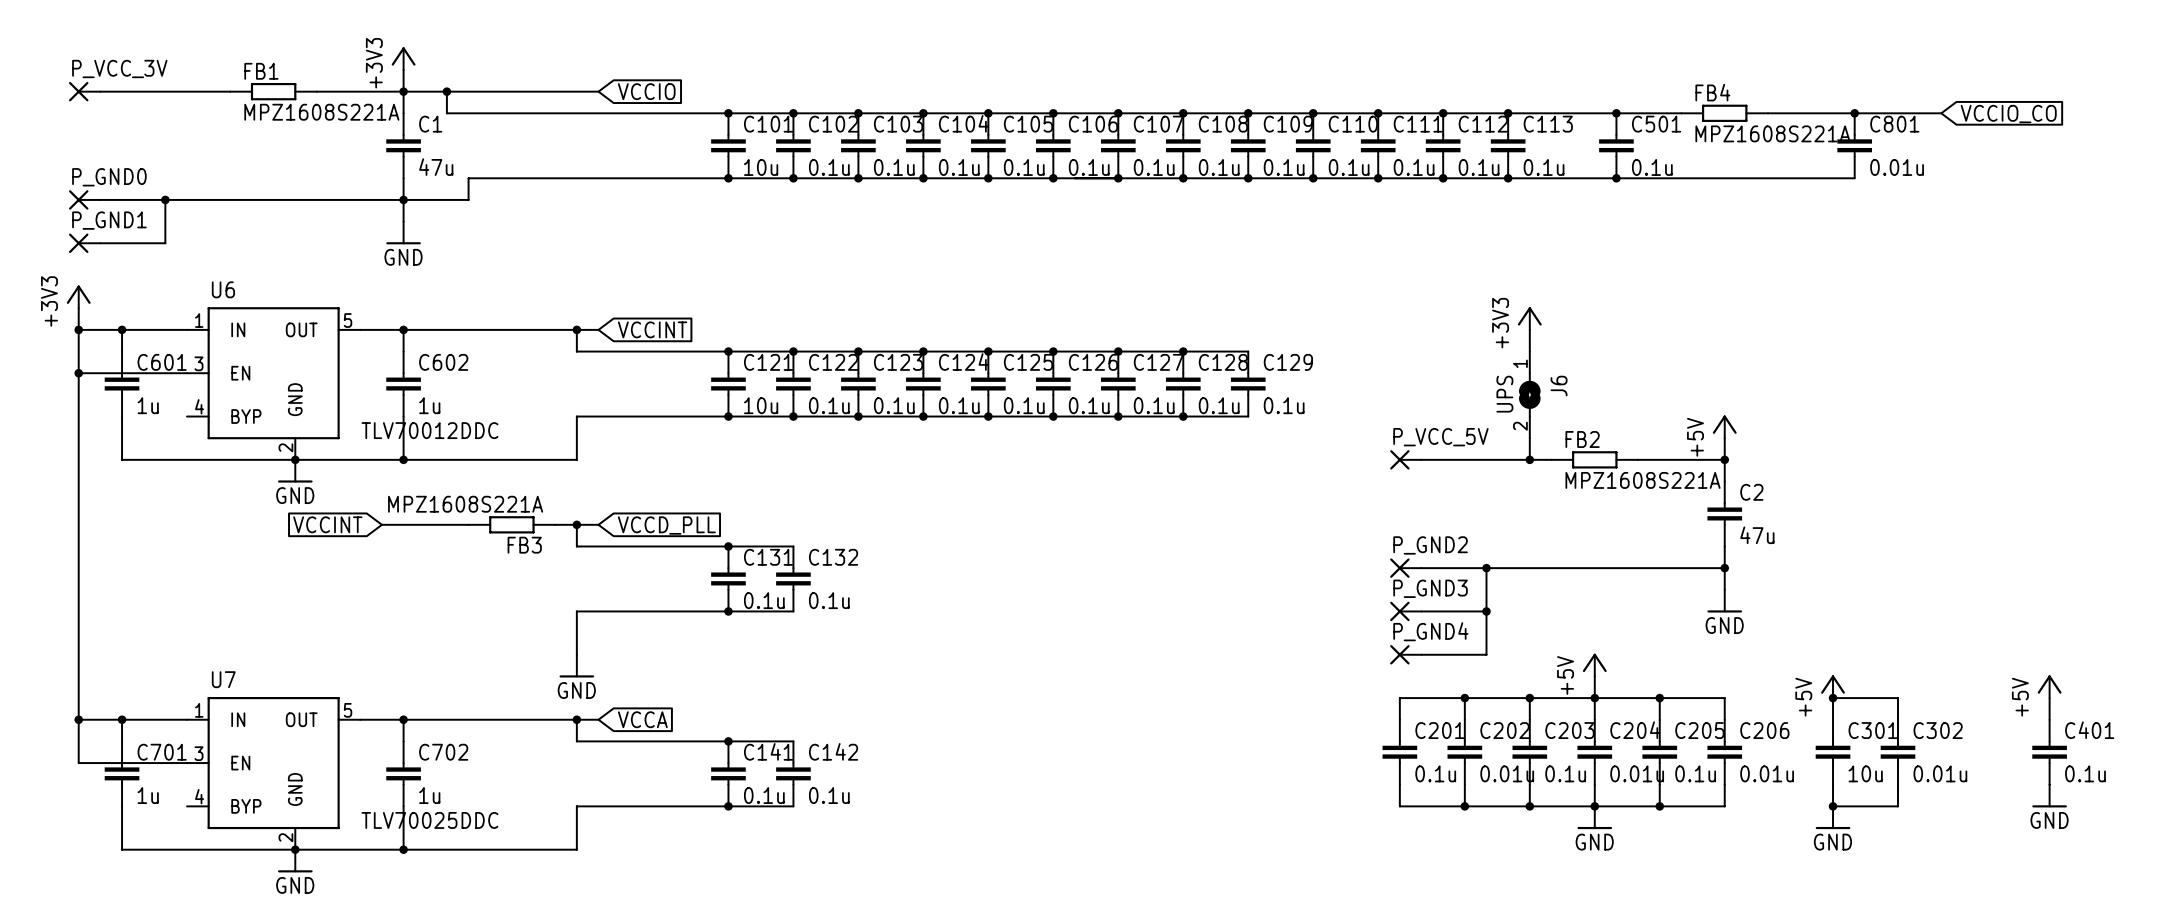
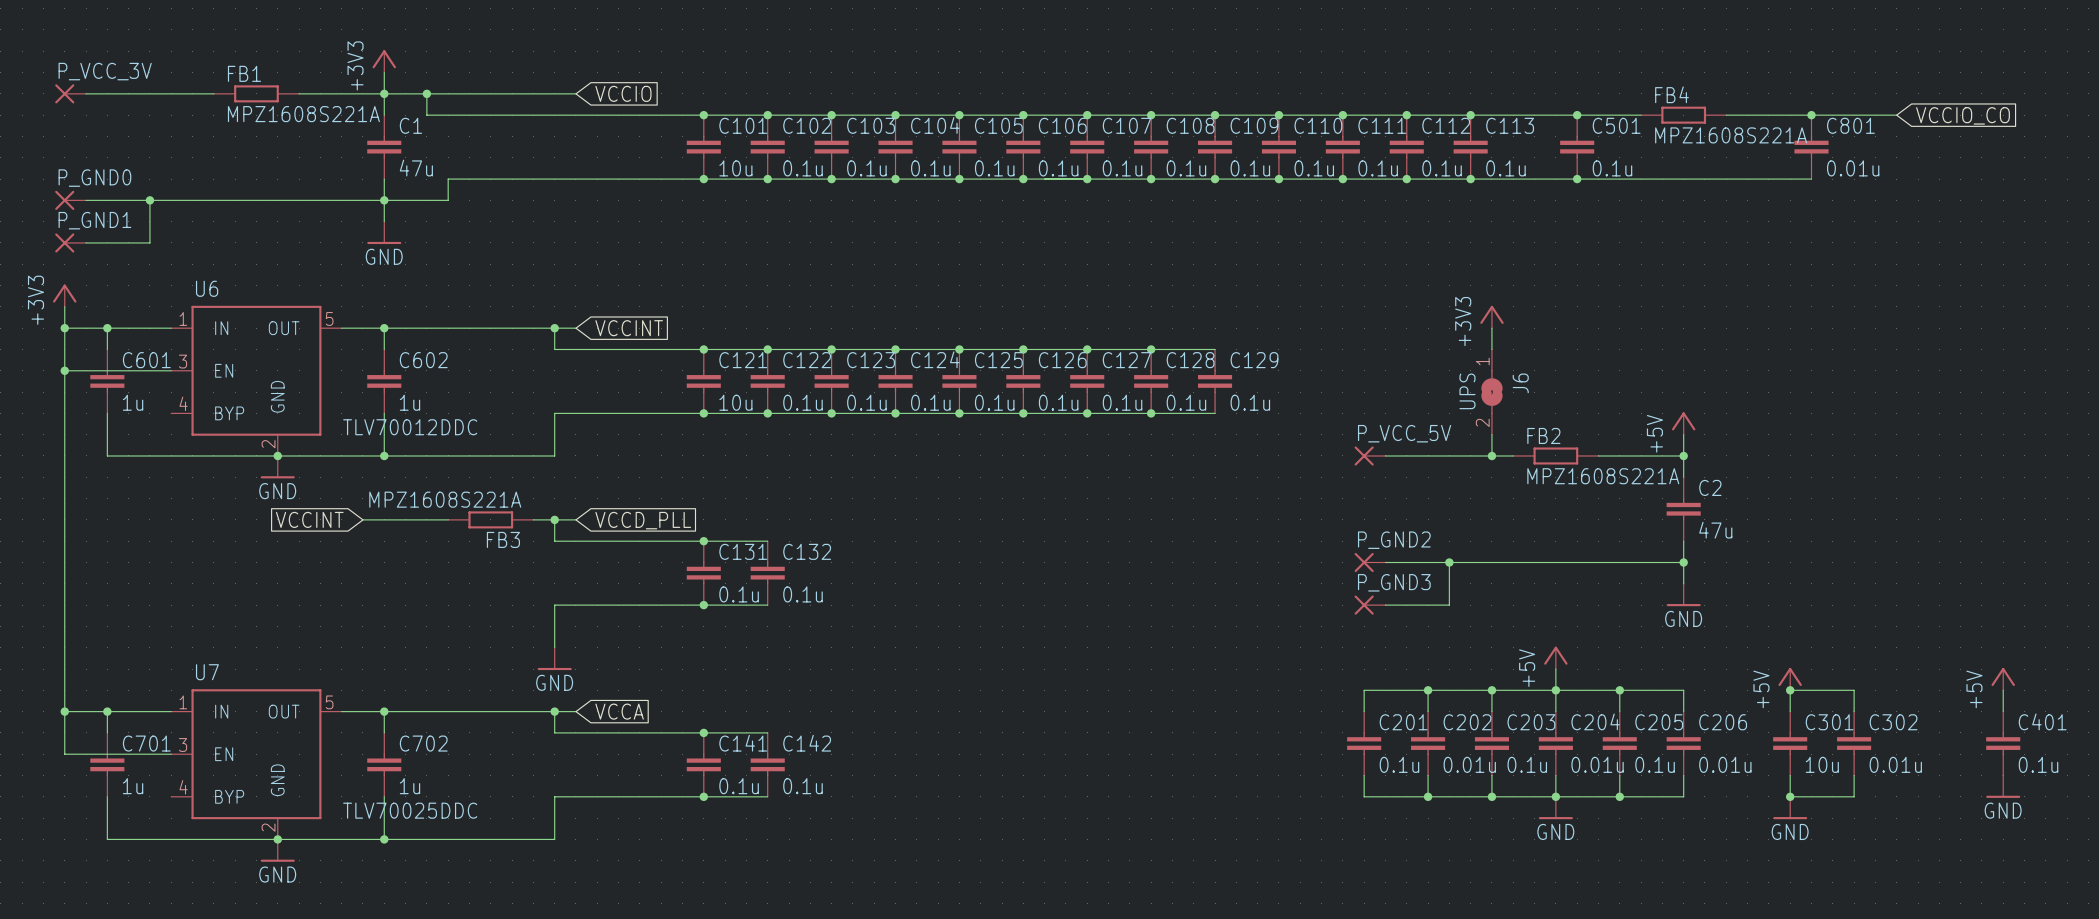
wire: (1486, 611) (1486, 654) (1421, 654) -> none
junction: (1486, 611) -> none
P_GND4: (1405, 654) -> none

